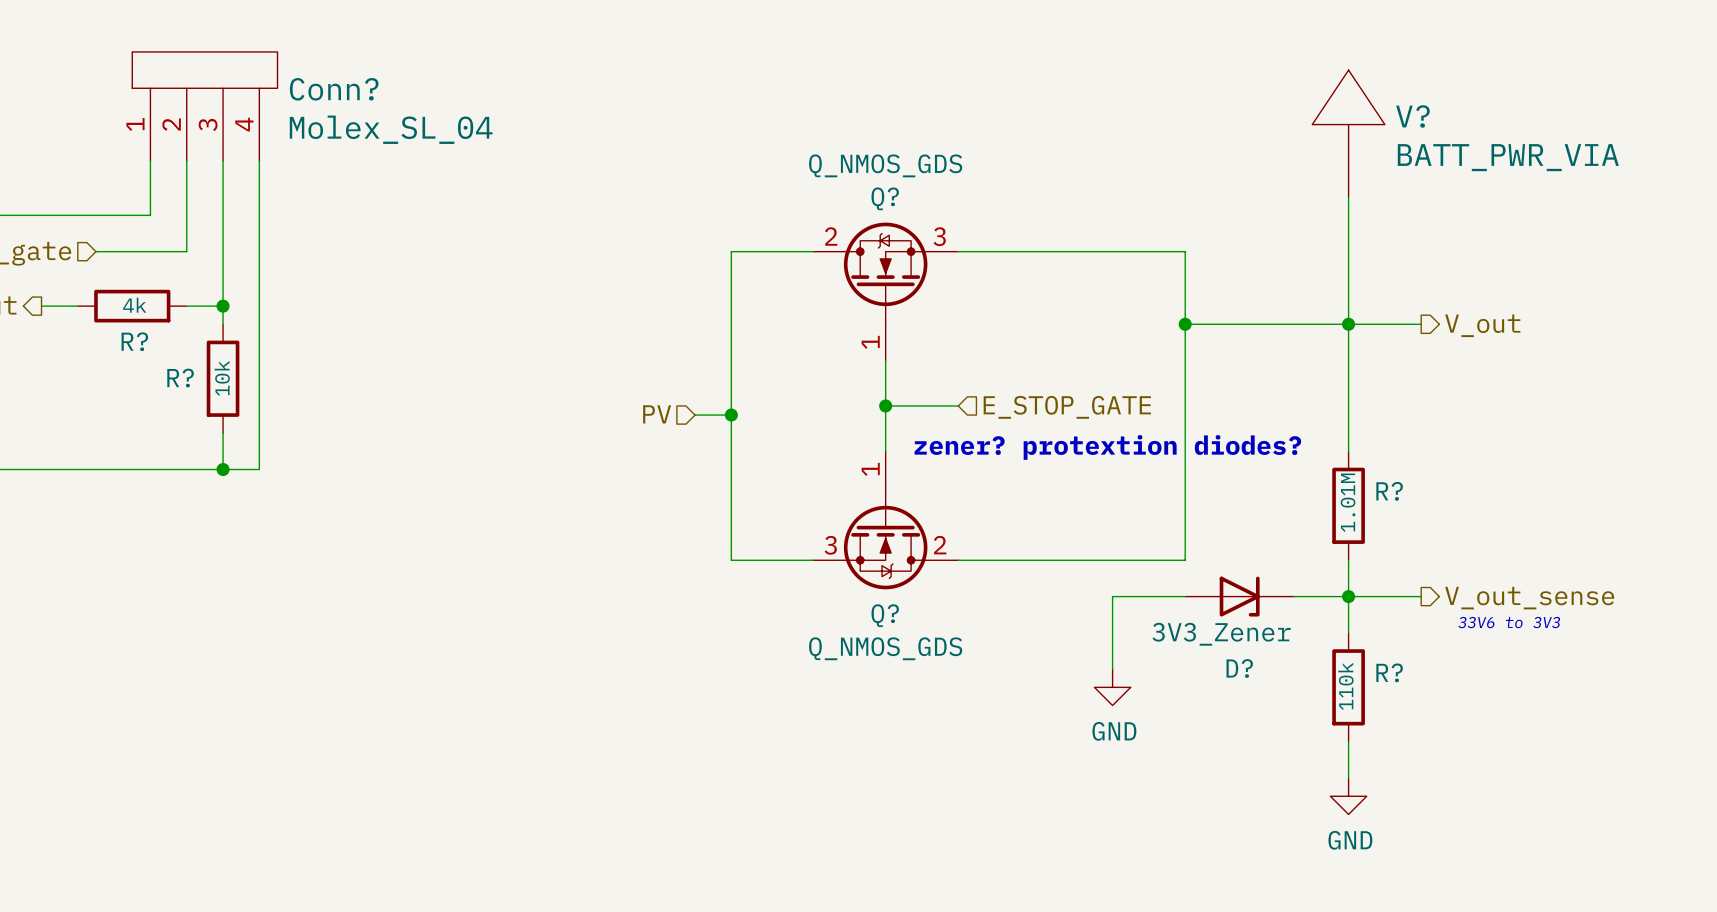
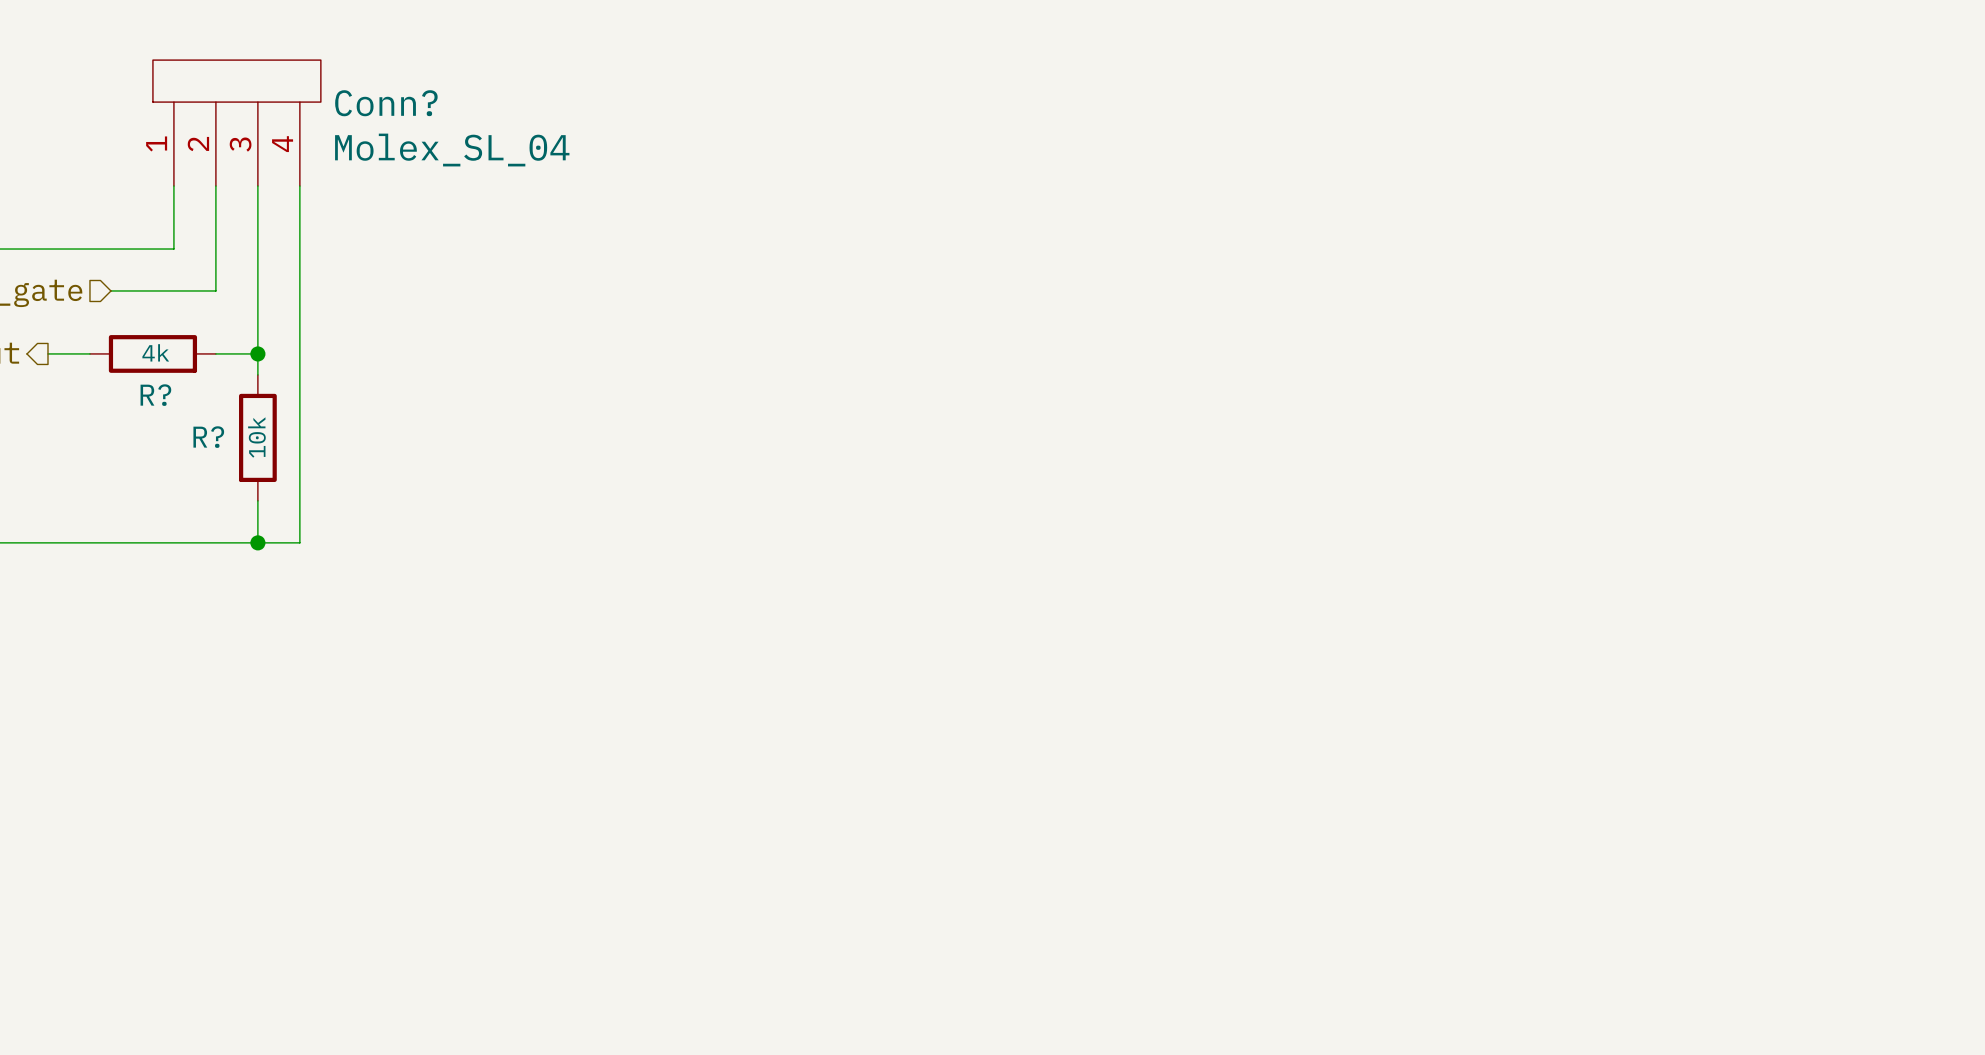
V?: BATT_PWR_VIA (1348, 133) -> none
wire: (1348, 197) (1348, 451) -> none
wire: (813, 251) (731, 251) (731, 560) (813, 560) -> none
wire: (958, 251) (1185, 251) (1185, 560) (958, 560) -> none
Q?: Q_NMOS_GDS (885, 291) -> none
wire: (1185, 324) (1421, 324) -> none
junction: (1185, 324) -> none
junction: (1348, 324) -> none
hierarchical label: V_out (1482, 325) -> none
wire: (885, 360) (885, 451) -> none
wire: (885, 405) (958, 405) -> none
junction: (885, 405) -> none
hierarchical label: E_STOP_GATE (1067, 407) -> none
hierarchical label: PV (657, 414) -> none
wire: (695, 415) (731, 415) -> none
junction: (731, 415) -> none
text: zener? protextion diodes? (1107, 447) -> none
R?: 1.01M (1348, 505) -> none
Q?: Q_NMOS_GDS (885, 520) -> none
wire: (1348, 560) (1348, 632) -> none
wire: (1185, 596) (1112, 596) (1112, 669) -> none
D?: 3V3_Zener (1239, 596) -> none
wire: (1294, 596) (1421, 596) -> none
junction: (1348, 596) -> none
hierarchical label: V_out_sense (1529, 598) -> none
text: 33V6 to 3V3 (1509, 622) -> none
power symbol: GND (1112, 687) -> none
R?: 110k (1348, 687) -> none
wire: (1348, 741) (1348, 778) -> none
power symbol: GND (1348, 796) -> none

